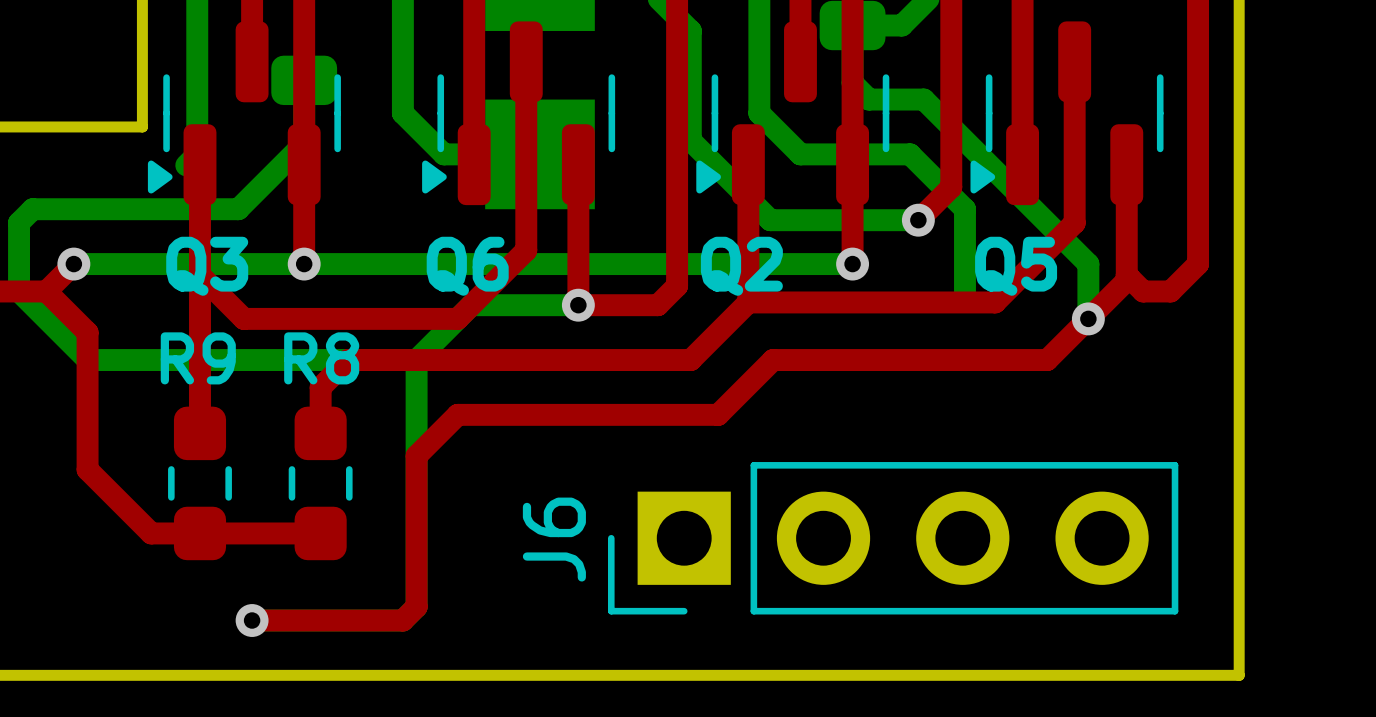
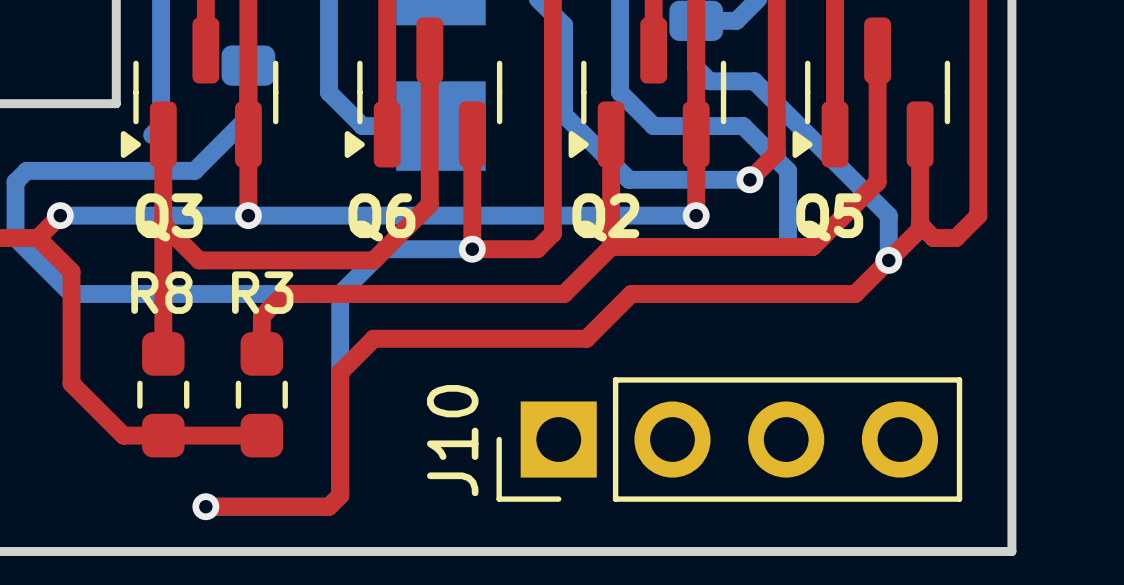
R9 name: R9 (198, 358) -> R8 (161, 292)
R8 name: R8 (321, 358) -> R3 (262, 292)
J6 name: J6 (554, 539) -> J10 (452, 440)

